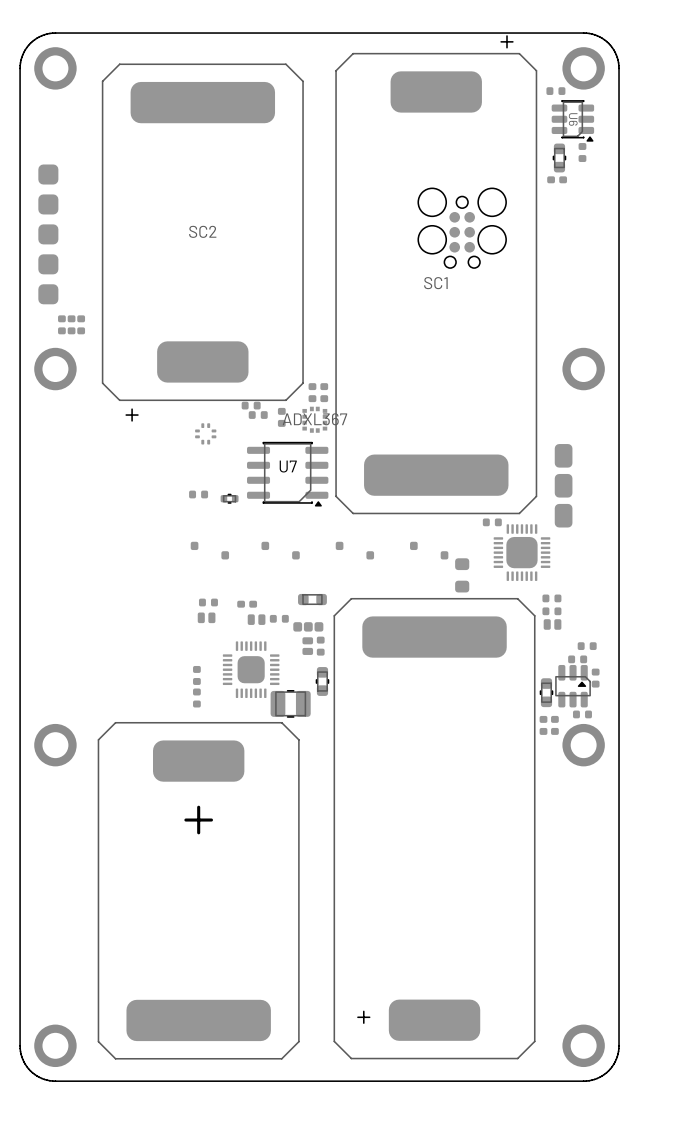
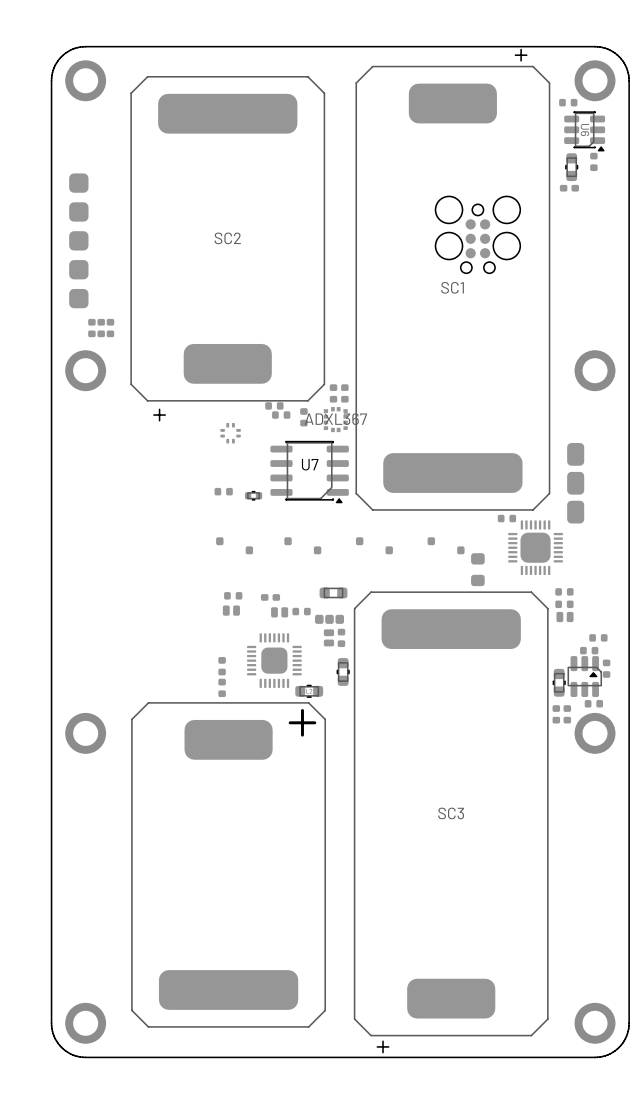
part: none -> (309, 691)
part: (290, 703) -> none
part footprint: [97, 722, 300, 1060] -> [131, 702, 326, 1028]
part: (434, 828) -> none
SC3: none -> (451, 822)

